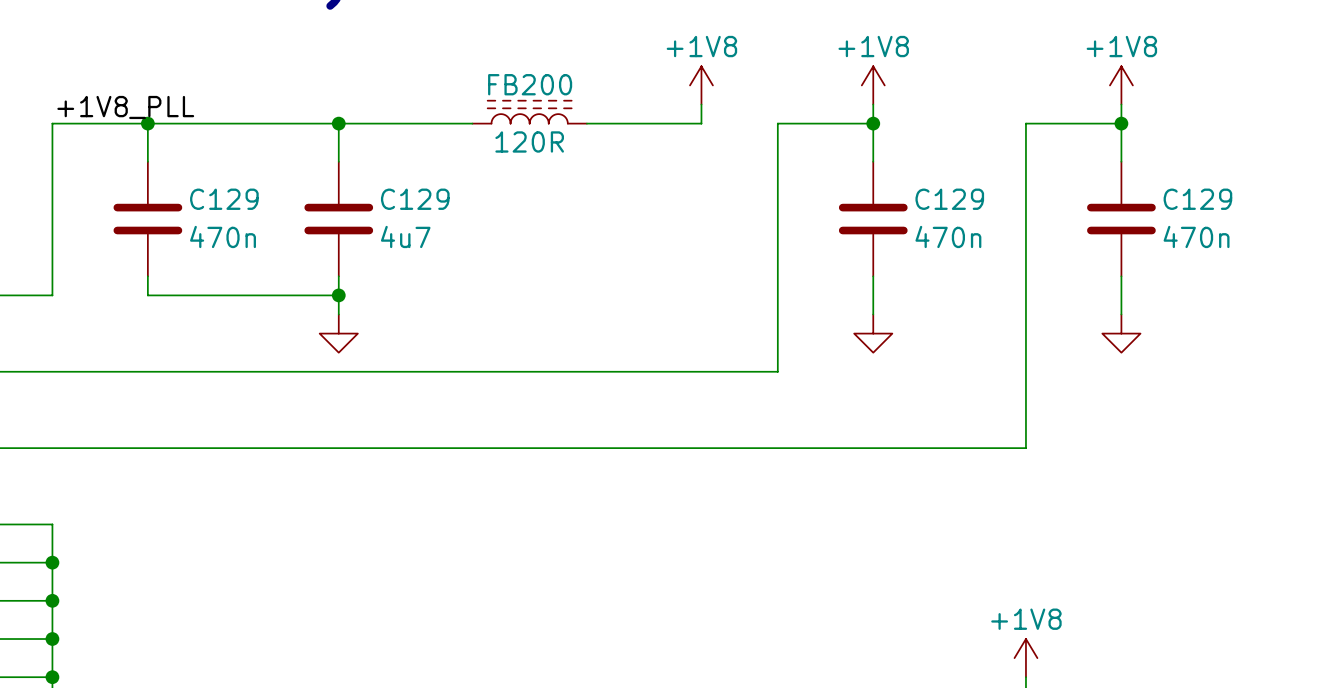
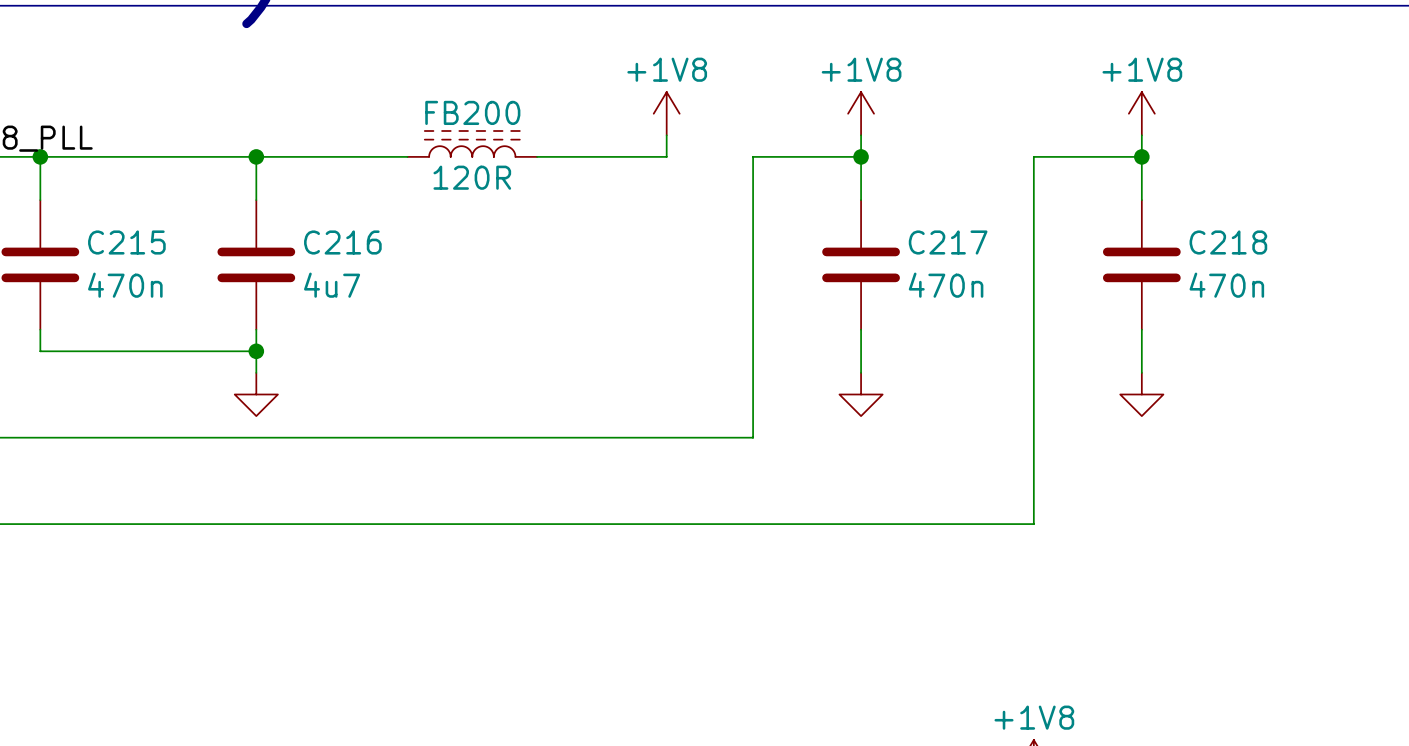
C129 name: C129 (224, 199) -> C215 (126, 242)
C129 name: C129 (415, 199) -> C216 (342, 242)
C129 name: C129 (949, 199) -> C217 (948, 242)
C129 name: C129 (1197, 199) -> C218 (1228, 242)

